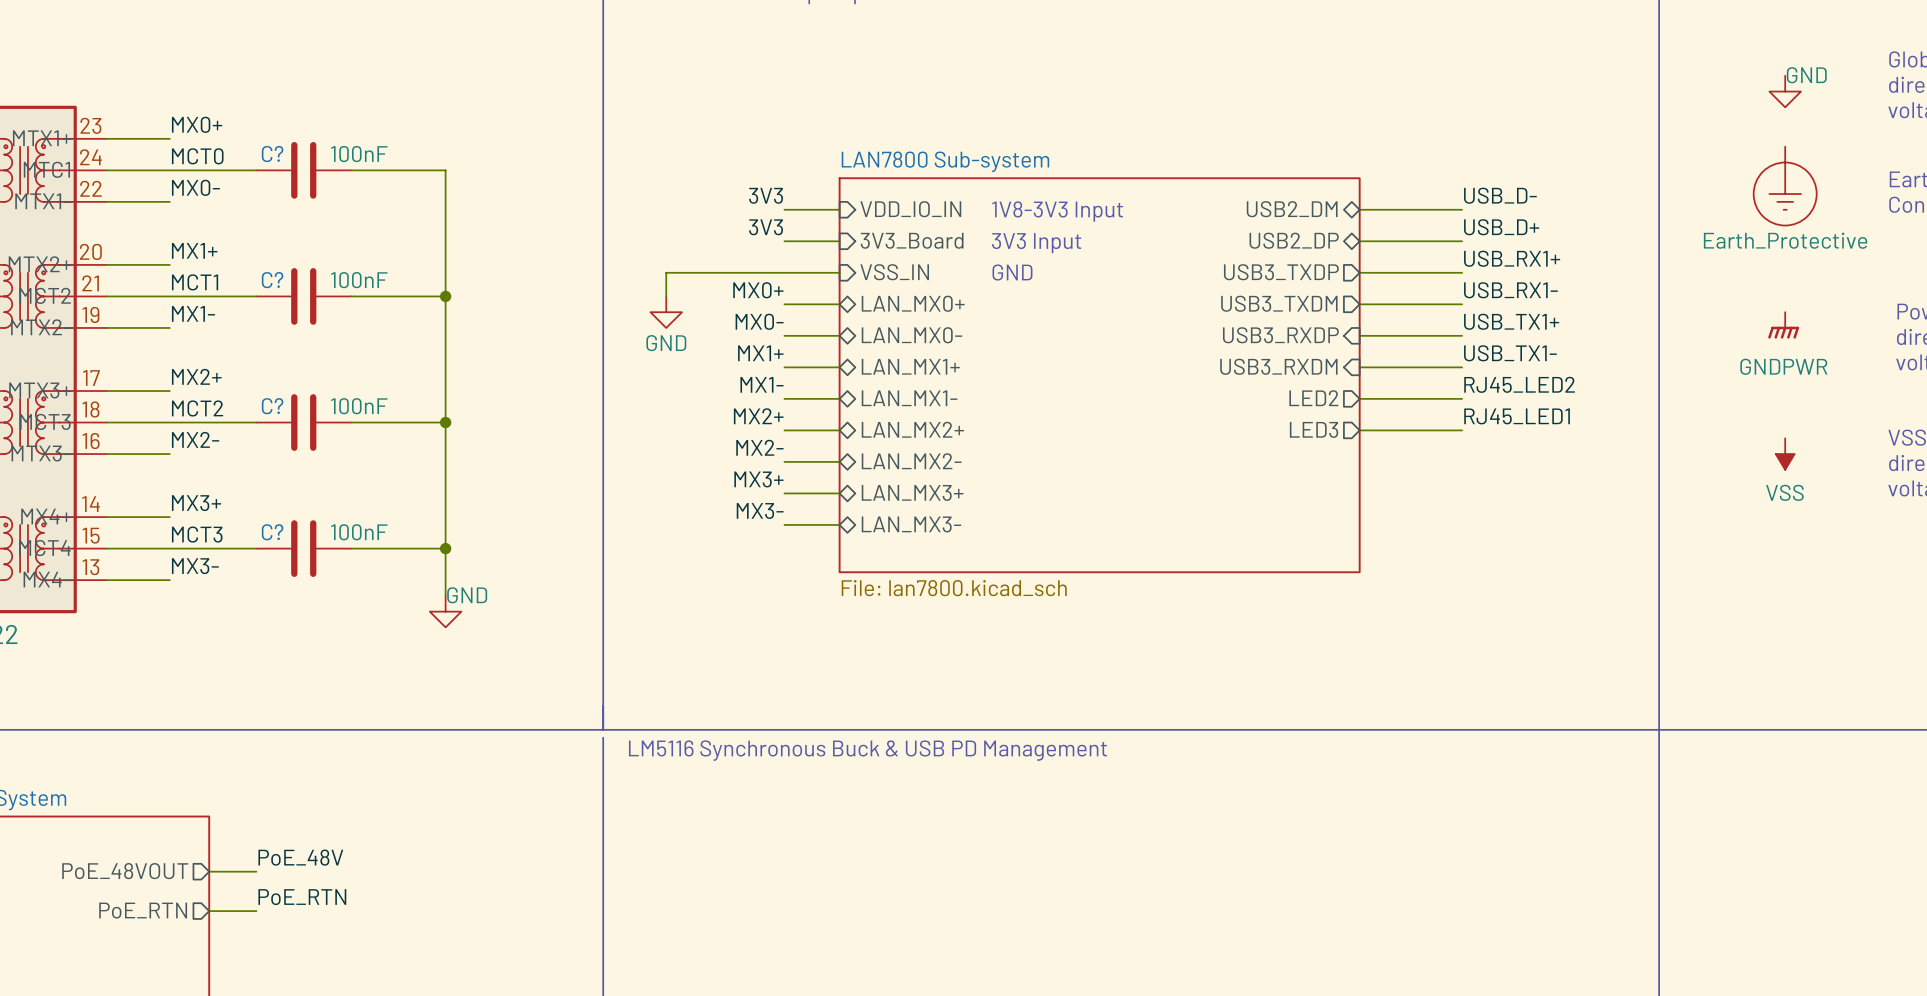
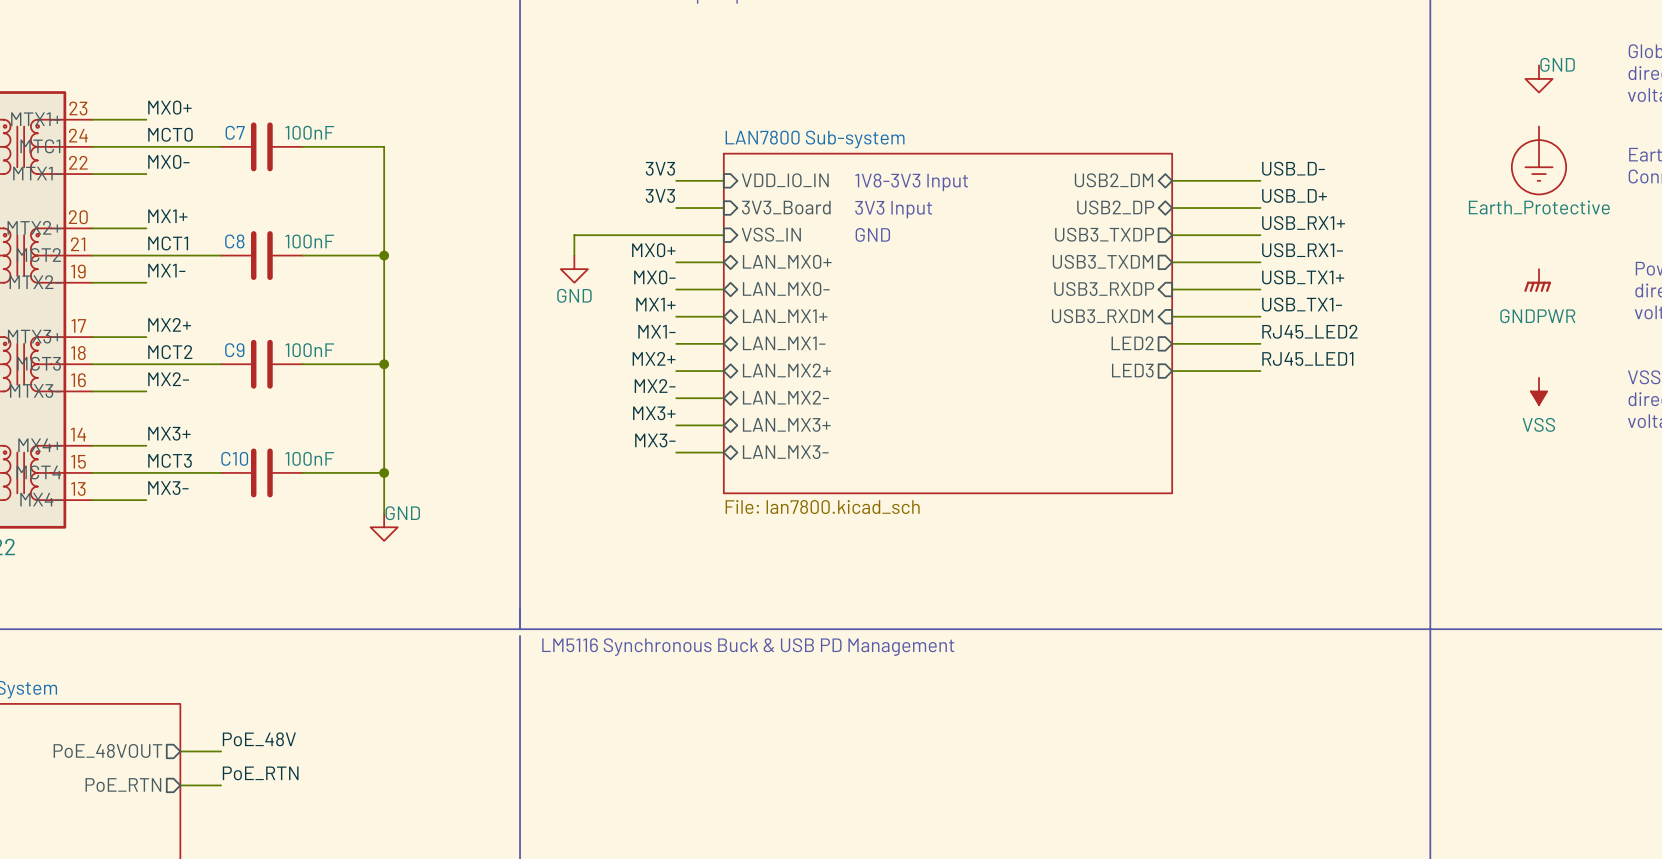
C? name: C? (272, 154) -> C7 (235, 132)
C? name: C? (272, 280) -> C8 (234, 241)
C? name: C? (272, 406) -> C9 (234, 350)
C? name: C? (272, 532) -> C10 (234, 458)

